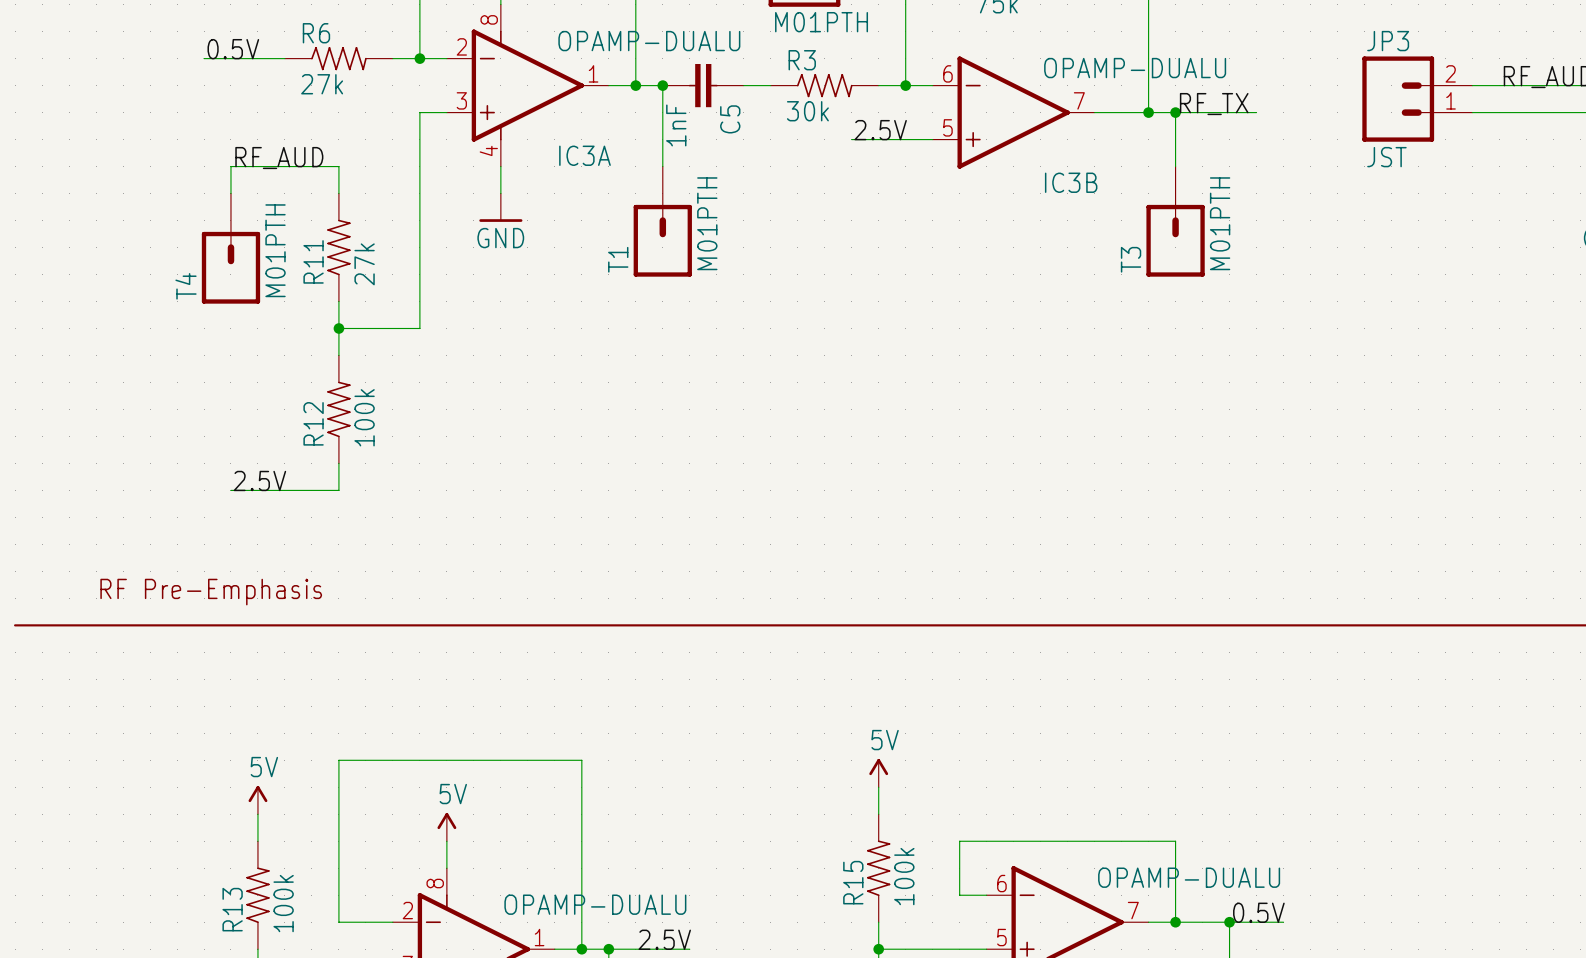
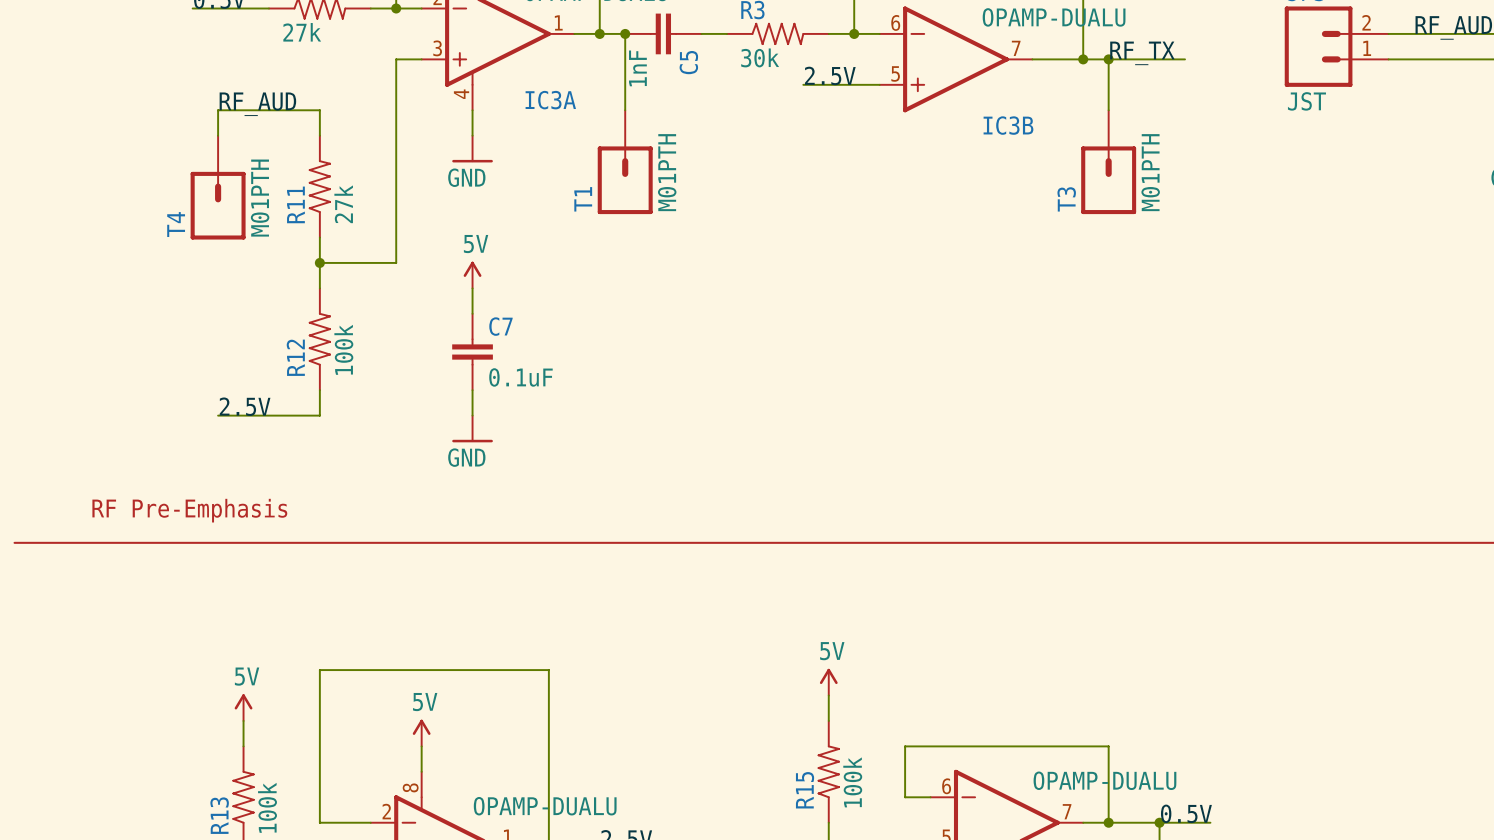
power symbol: none -> 5V (472, 275)
wire: none -> (472, 288) (472, 313)
C7: none -> 0.1uF (472, 352)
wire: none -> (472, 390) (472, 415)
power symbol: none -> GND (472, 428)

